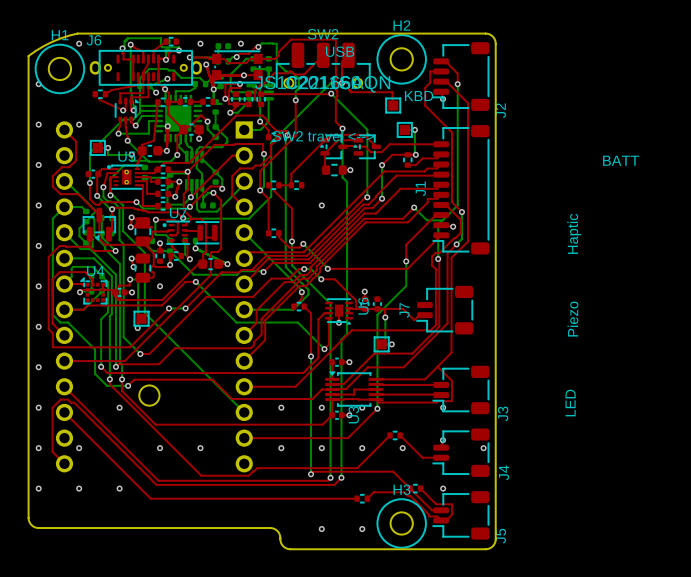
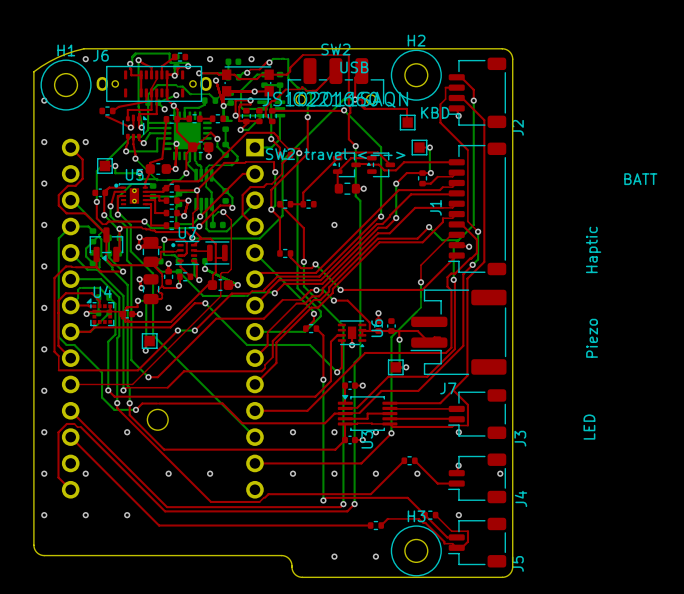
J7 footprint: [416, 285, 474, 335] -> [410, 289, 507, 375]
J7 name position: J7 (404, 310) -> J7 (448, 388)

